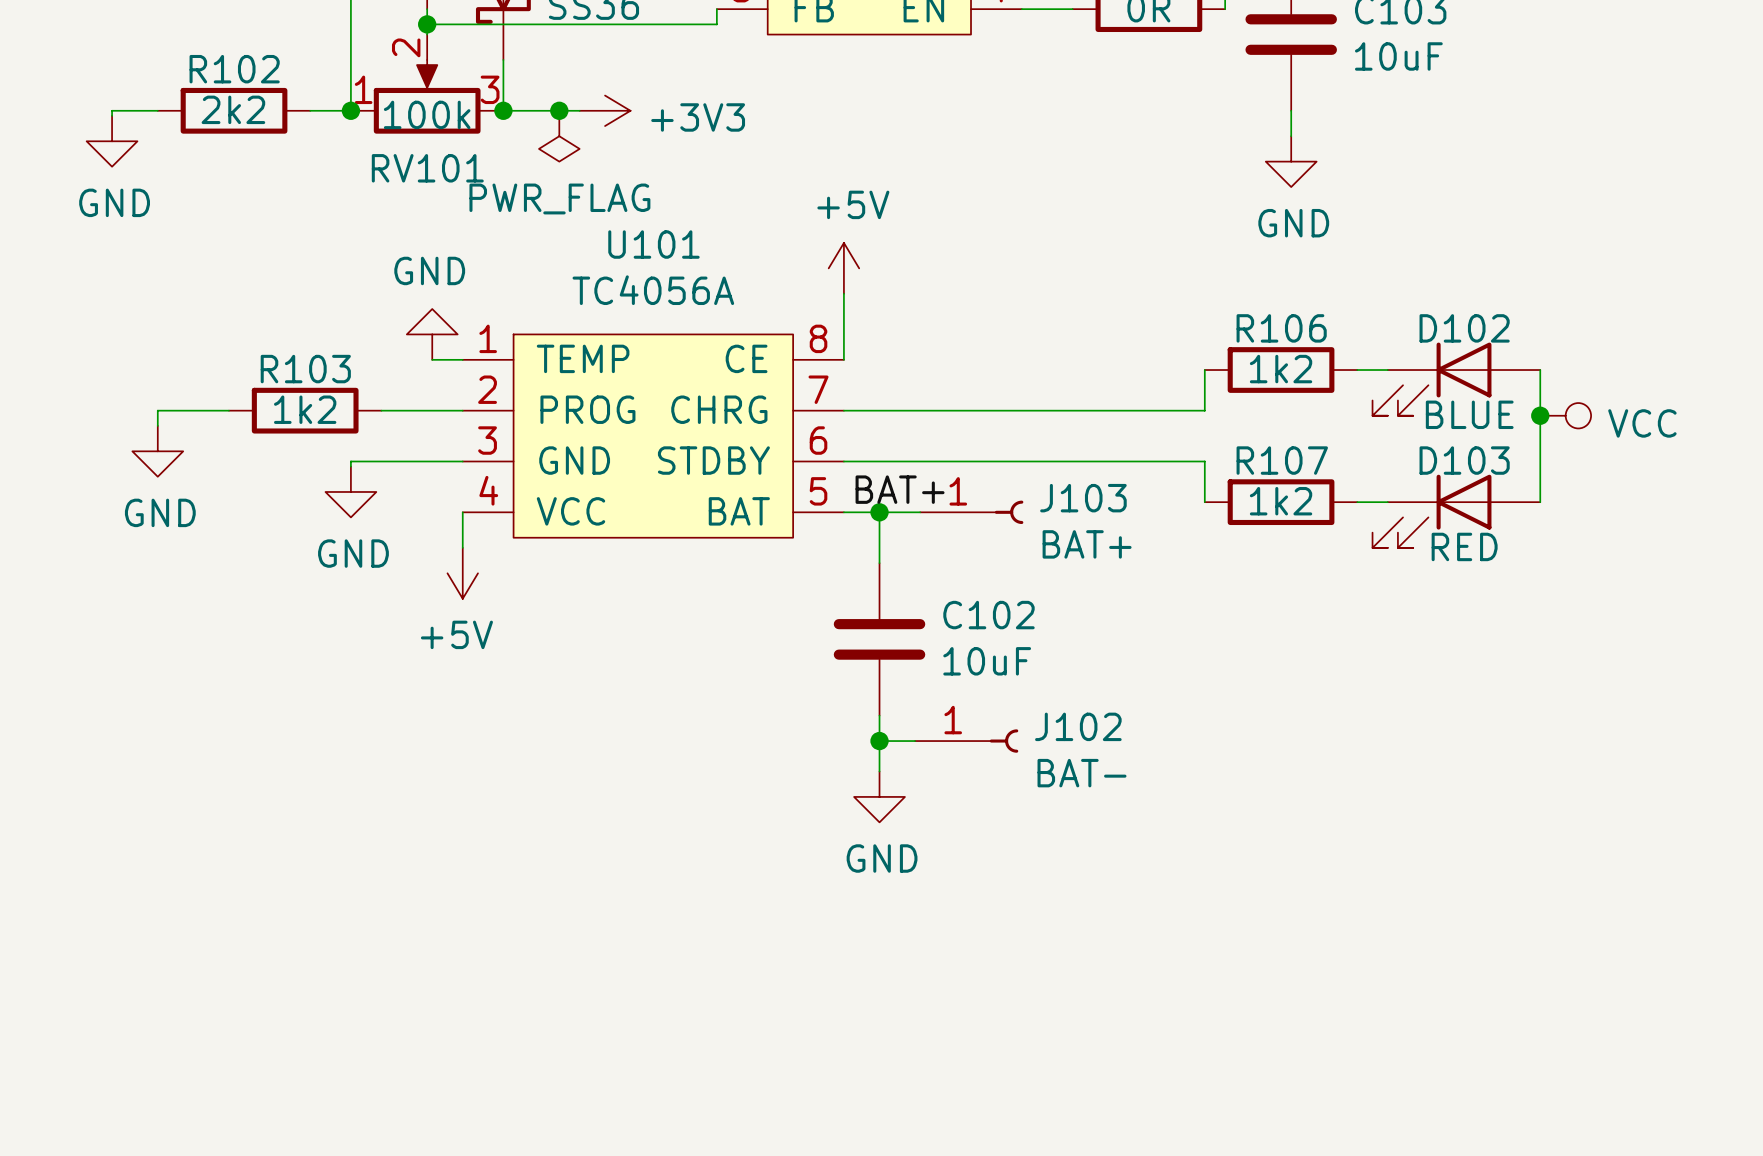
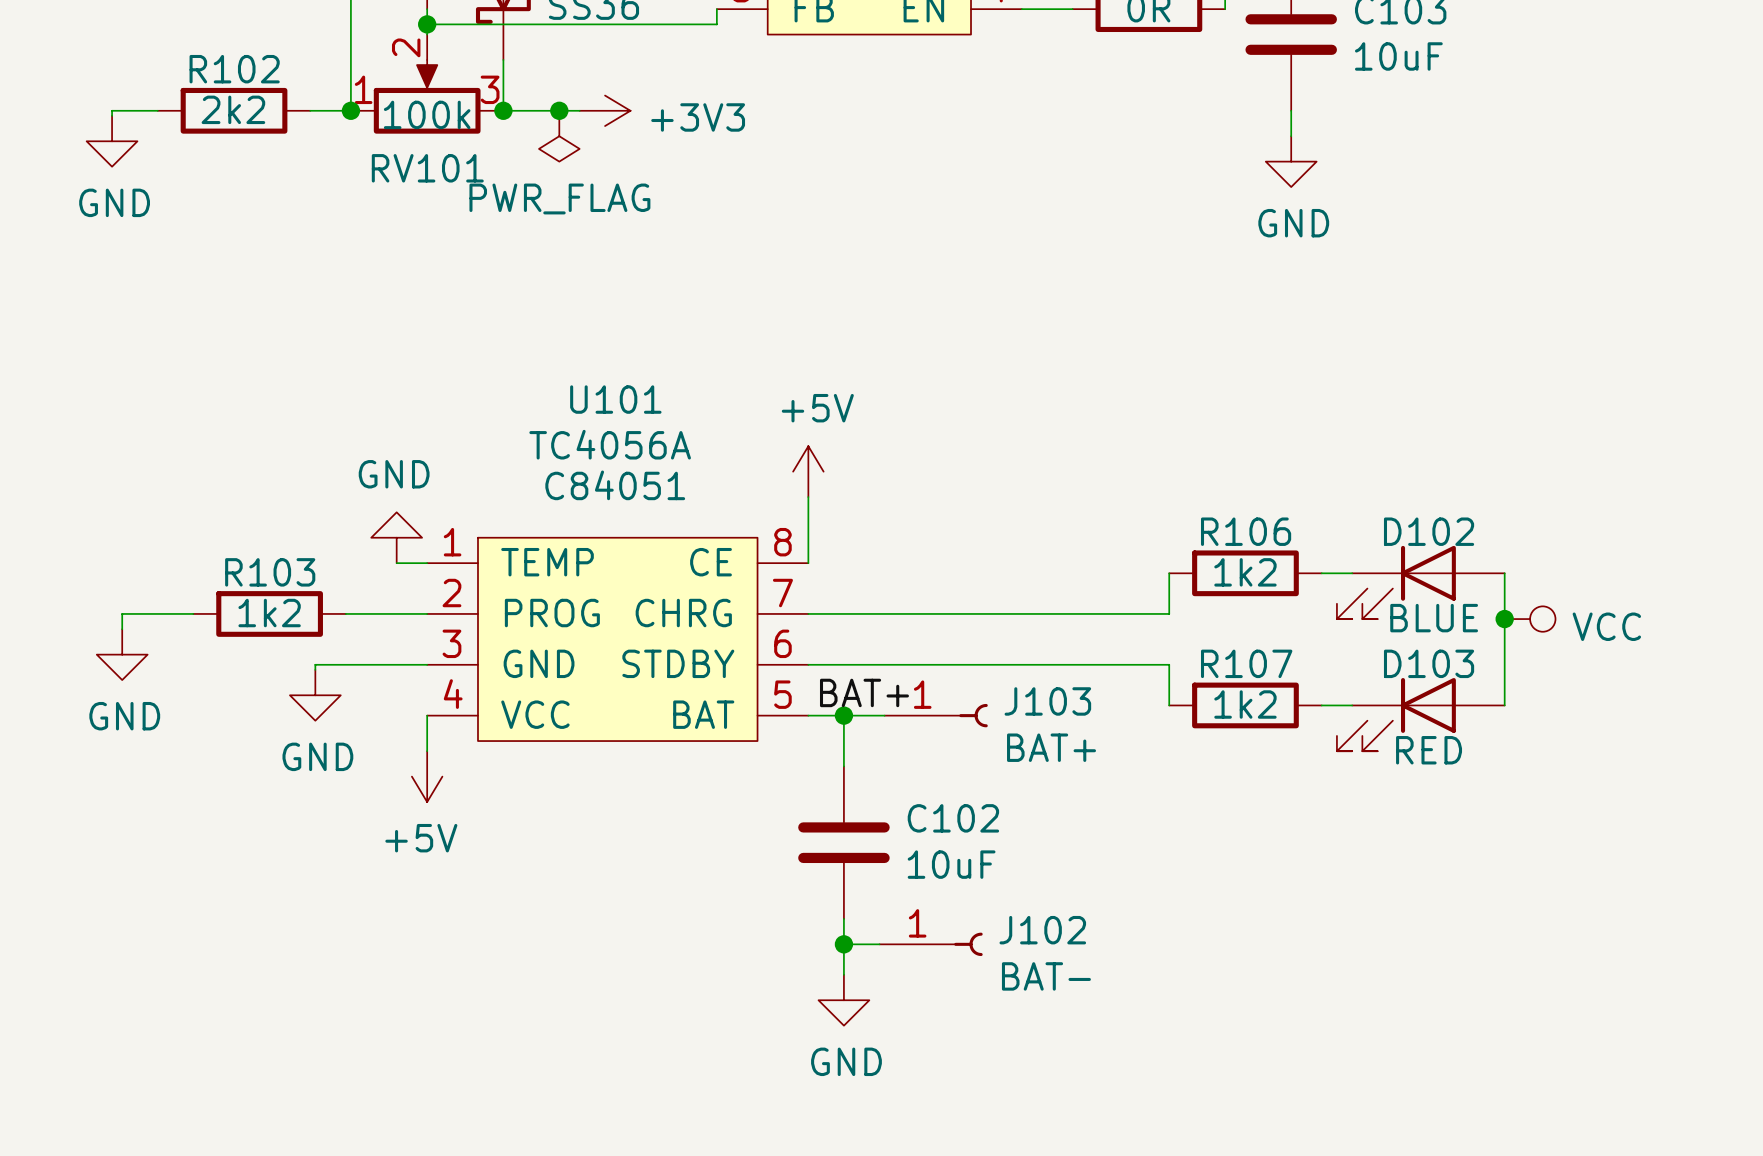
U101 name position: U101 (653, 244) -> U101 (615, 399)
power symbol: +5V (843, 268) -> none
U101 value position: TC4056A (653, 290) -> TC4056A (610, 444)
wire: (843, 293) (843, 359) -> (808, 497) (808, 563)
power symbol: GND (432, 334) -> none
wire: (432, 359) (462, 359) -> (396, 563) (427, 563)
wire: (1204, 370) (1204, 410) (843, 410) -> (1169, 573) (1169, 613) (808, 613)
R106 position: (1281, 370) -> (1245, 573)
wire: (1357, 370) (1387, 370) -> (1321, 573) (1352, 573)
wire: (1540, 370) (1540, 502) -> (1504, 573) (1504, 705)
D102 position: (1456, 379) -> (1420, 582)
wire: (228, 410) (157, 410) (157, 425) -> (193, 613) (122, 613) (122, 629)
R103 position: (305, 410) -> (269, 613)
wire: (381, 410) (462, 410) -> (345, 613) (427, 613)
junction: (1540, 415) -> none
power symbol position: VCC (1565, 415) -> VCC (1530, 619)
U101 position: (653, 436) -> (617, 639)
power symbol: GND (157, 451) -> none
wire: (462, 461) (350, 461) (350, 466) -> (427, 664) (315, 664) (315, 669)
wire: (843, 461) (1204, 461) (1204, 502) -> (808, 664) (1169, 664) (1169, 705)
power symbol: none -> +5V (808, 471)
U101 text: none -> C84051 (615, 485)
label position: BAT+ (900, 489) -> BAT+ (864, 692)
power symbol rotation: 0° (350, 491) -> 180° (396, 537)
power symbol position: GND (350, 491) -> GND (396, 537)
R107 position: (1281, 502) -> (1245, 705)
wire: (1357, 502) (1387, 502) -> (1321, 705) (1352, 705)
D103 position: (1456, 511) -> (1420, 714)
wire: (462, 512) (462, 547) -> (427, 715) (427, 751)
wire: (843, 512) (920, 512) -> (808, 715) (884, 715)
wire: (879, 512) (879, 563) -> (843, 715) (843, 766)
junction: (879, 512) -> none
J103 position: (971, 512) -> (936, 715)
power symbol: +5V (462, 573) -> none
junction: none -> (1504, 619)
C102 position: (879, 639) -> (843, 842)
power symbol: none -> GND (122, 654)
power symbol: none -> GND (315, 695)
wire: (879, 715) (879, 771) -> (843, 918) (843, 974)
wire: (879, 741) (915, 741) -> (843, 944) (879, 944)
junction position: (879, 741) -> (843, 715)
J102 position: (966, 741) -> (931, 944)
power symbol: none -> +5V (427, 776)
power symbol position: GND (879, 796) -> GND (843, 1000)
junction: none -> (843, 944)

